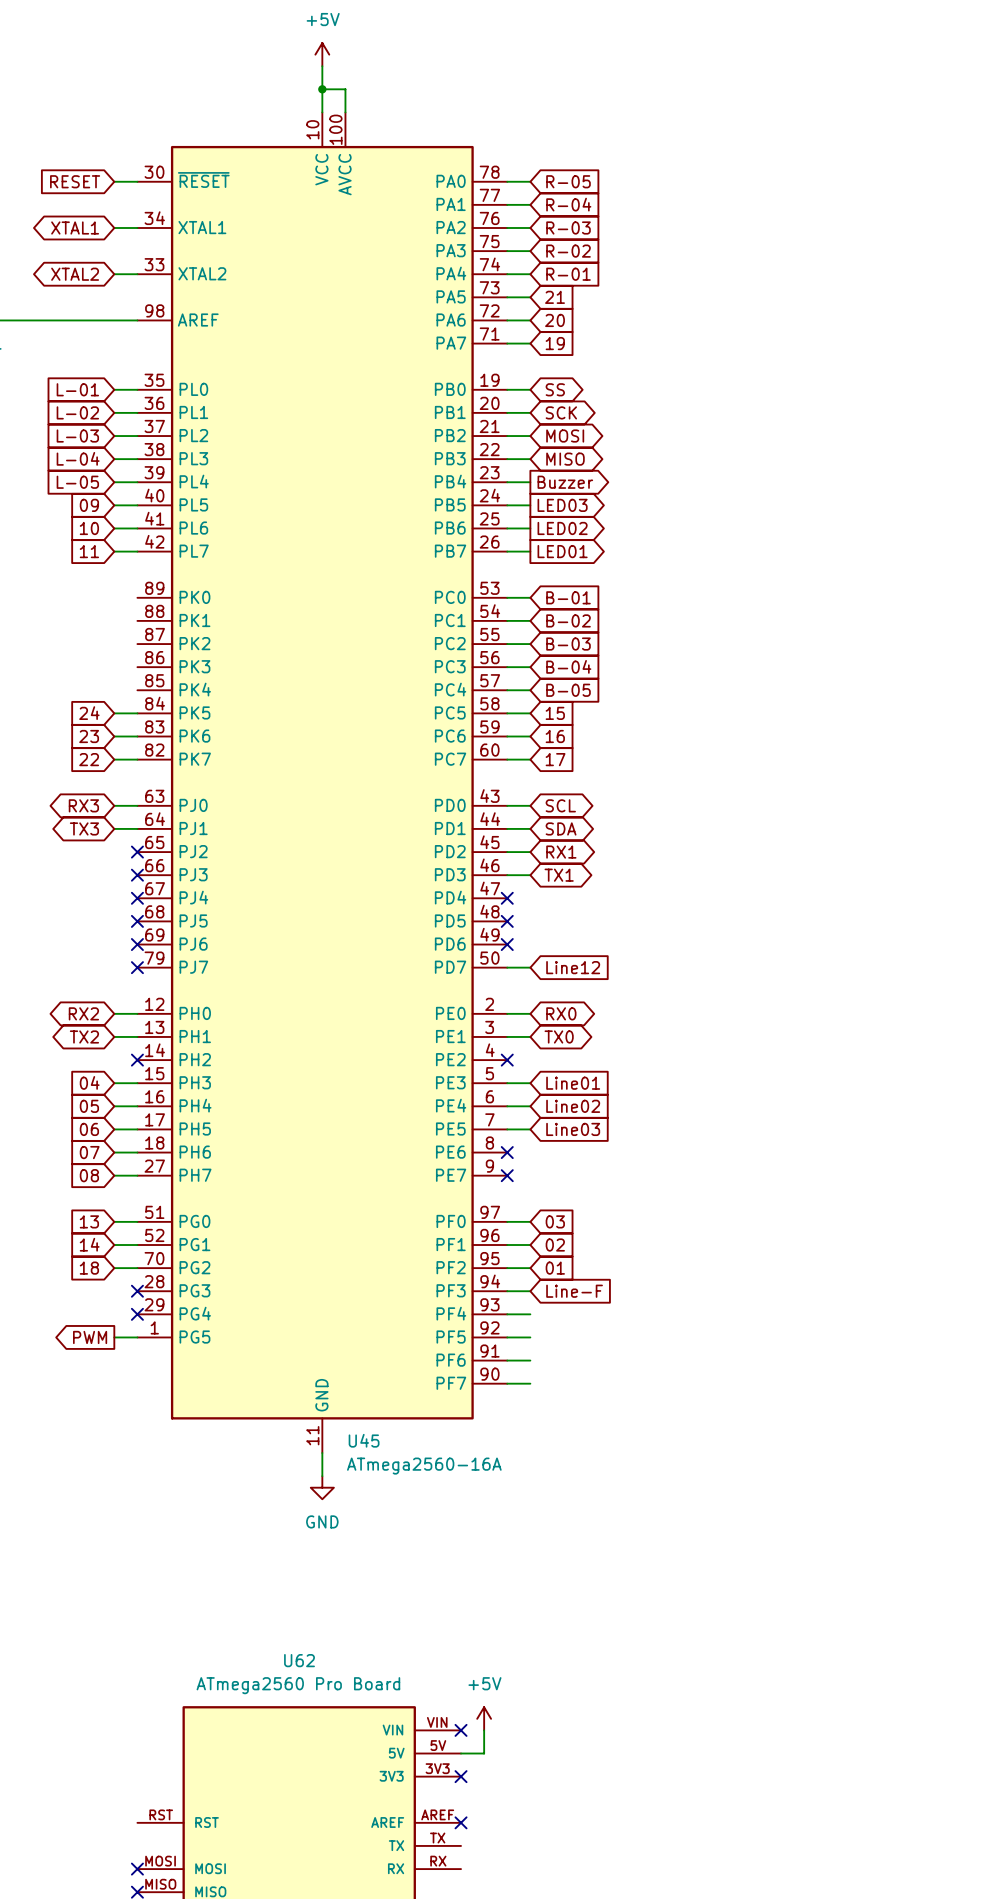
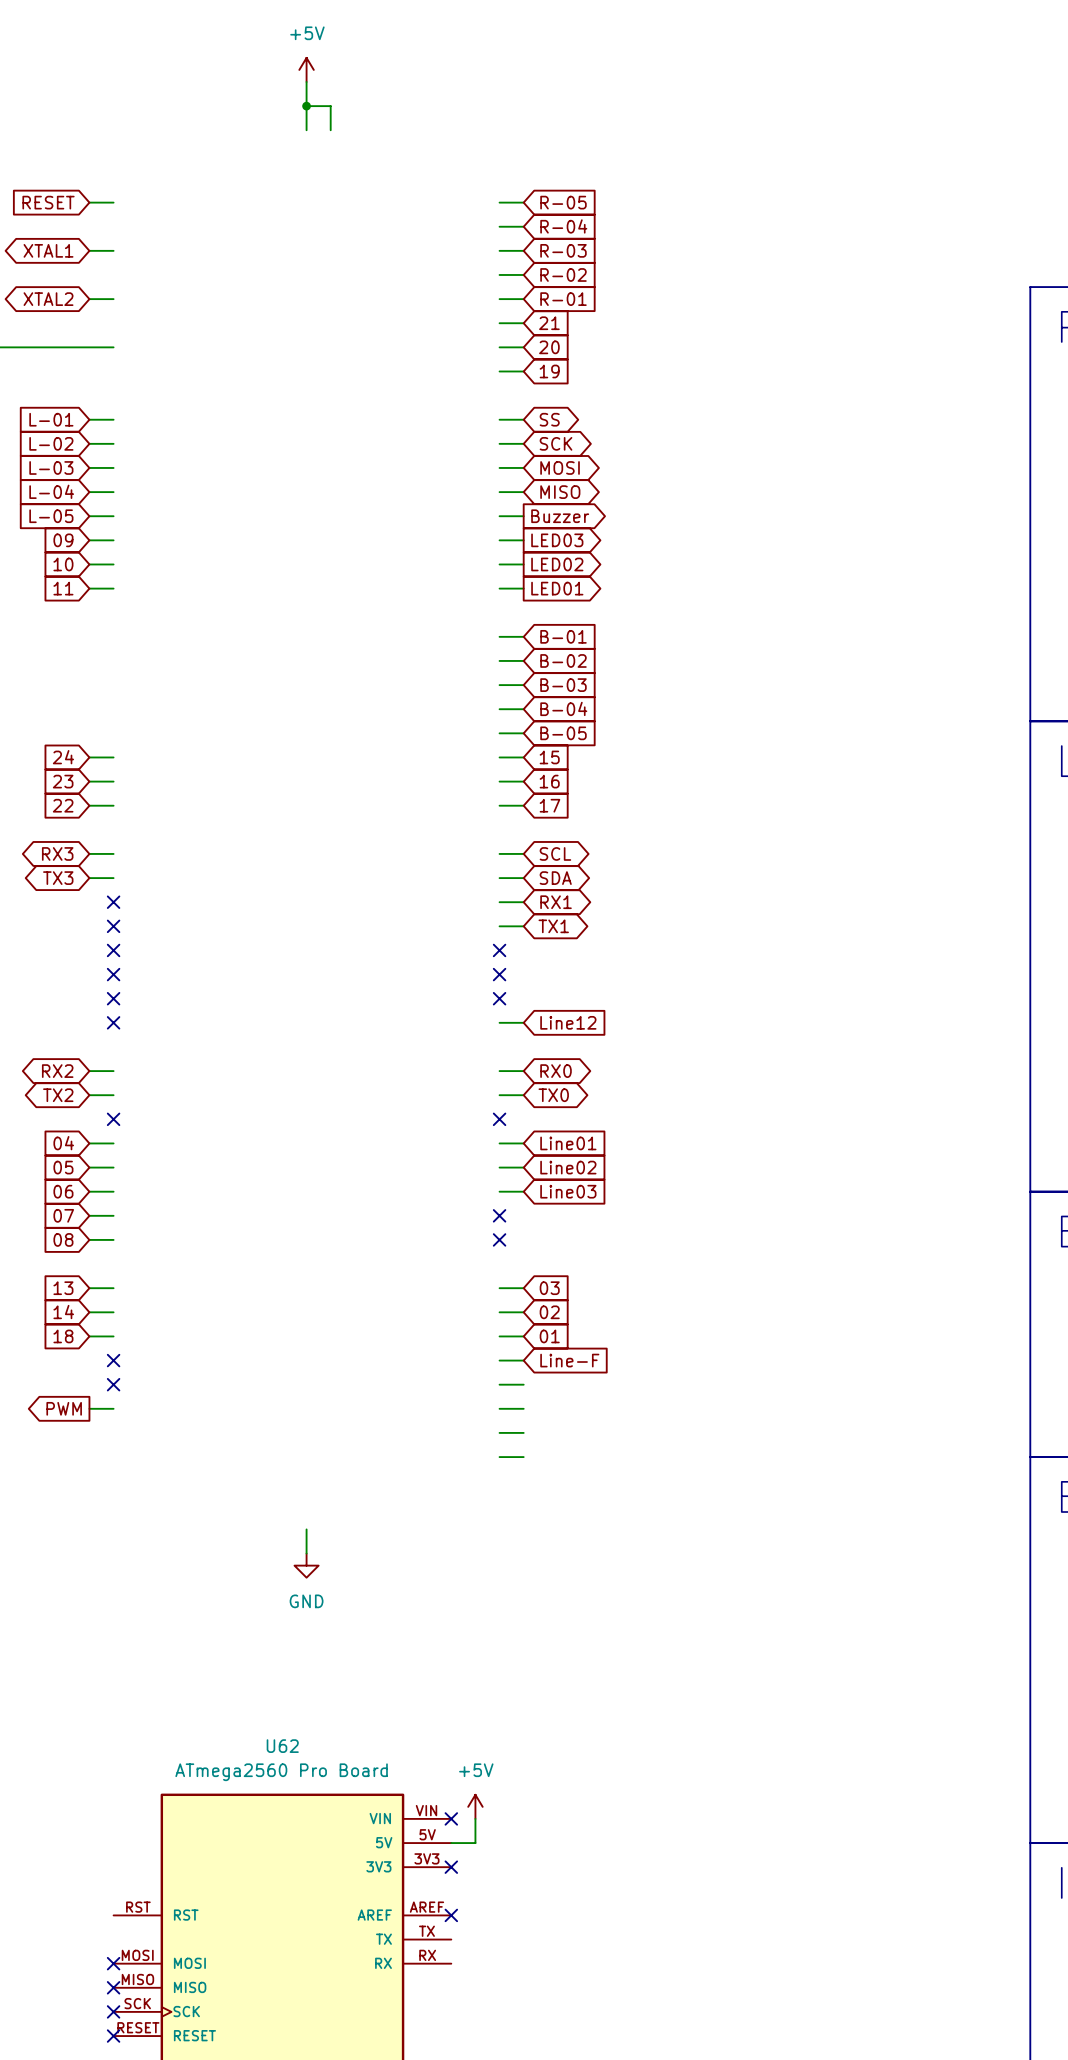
U45: ATmega2560-16A (322, 782) -> none

